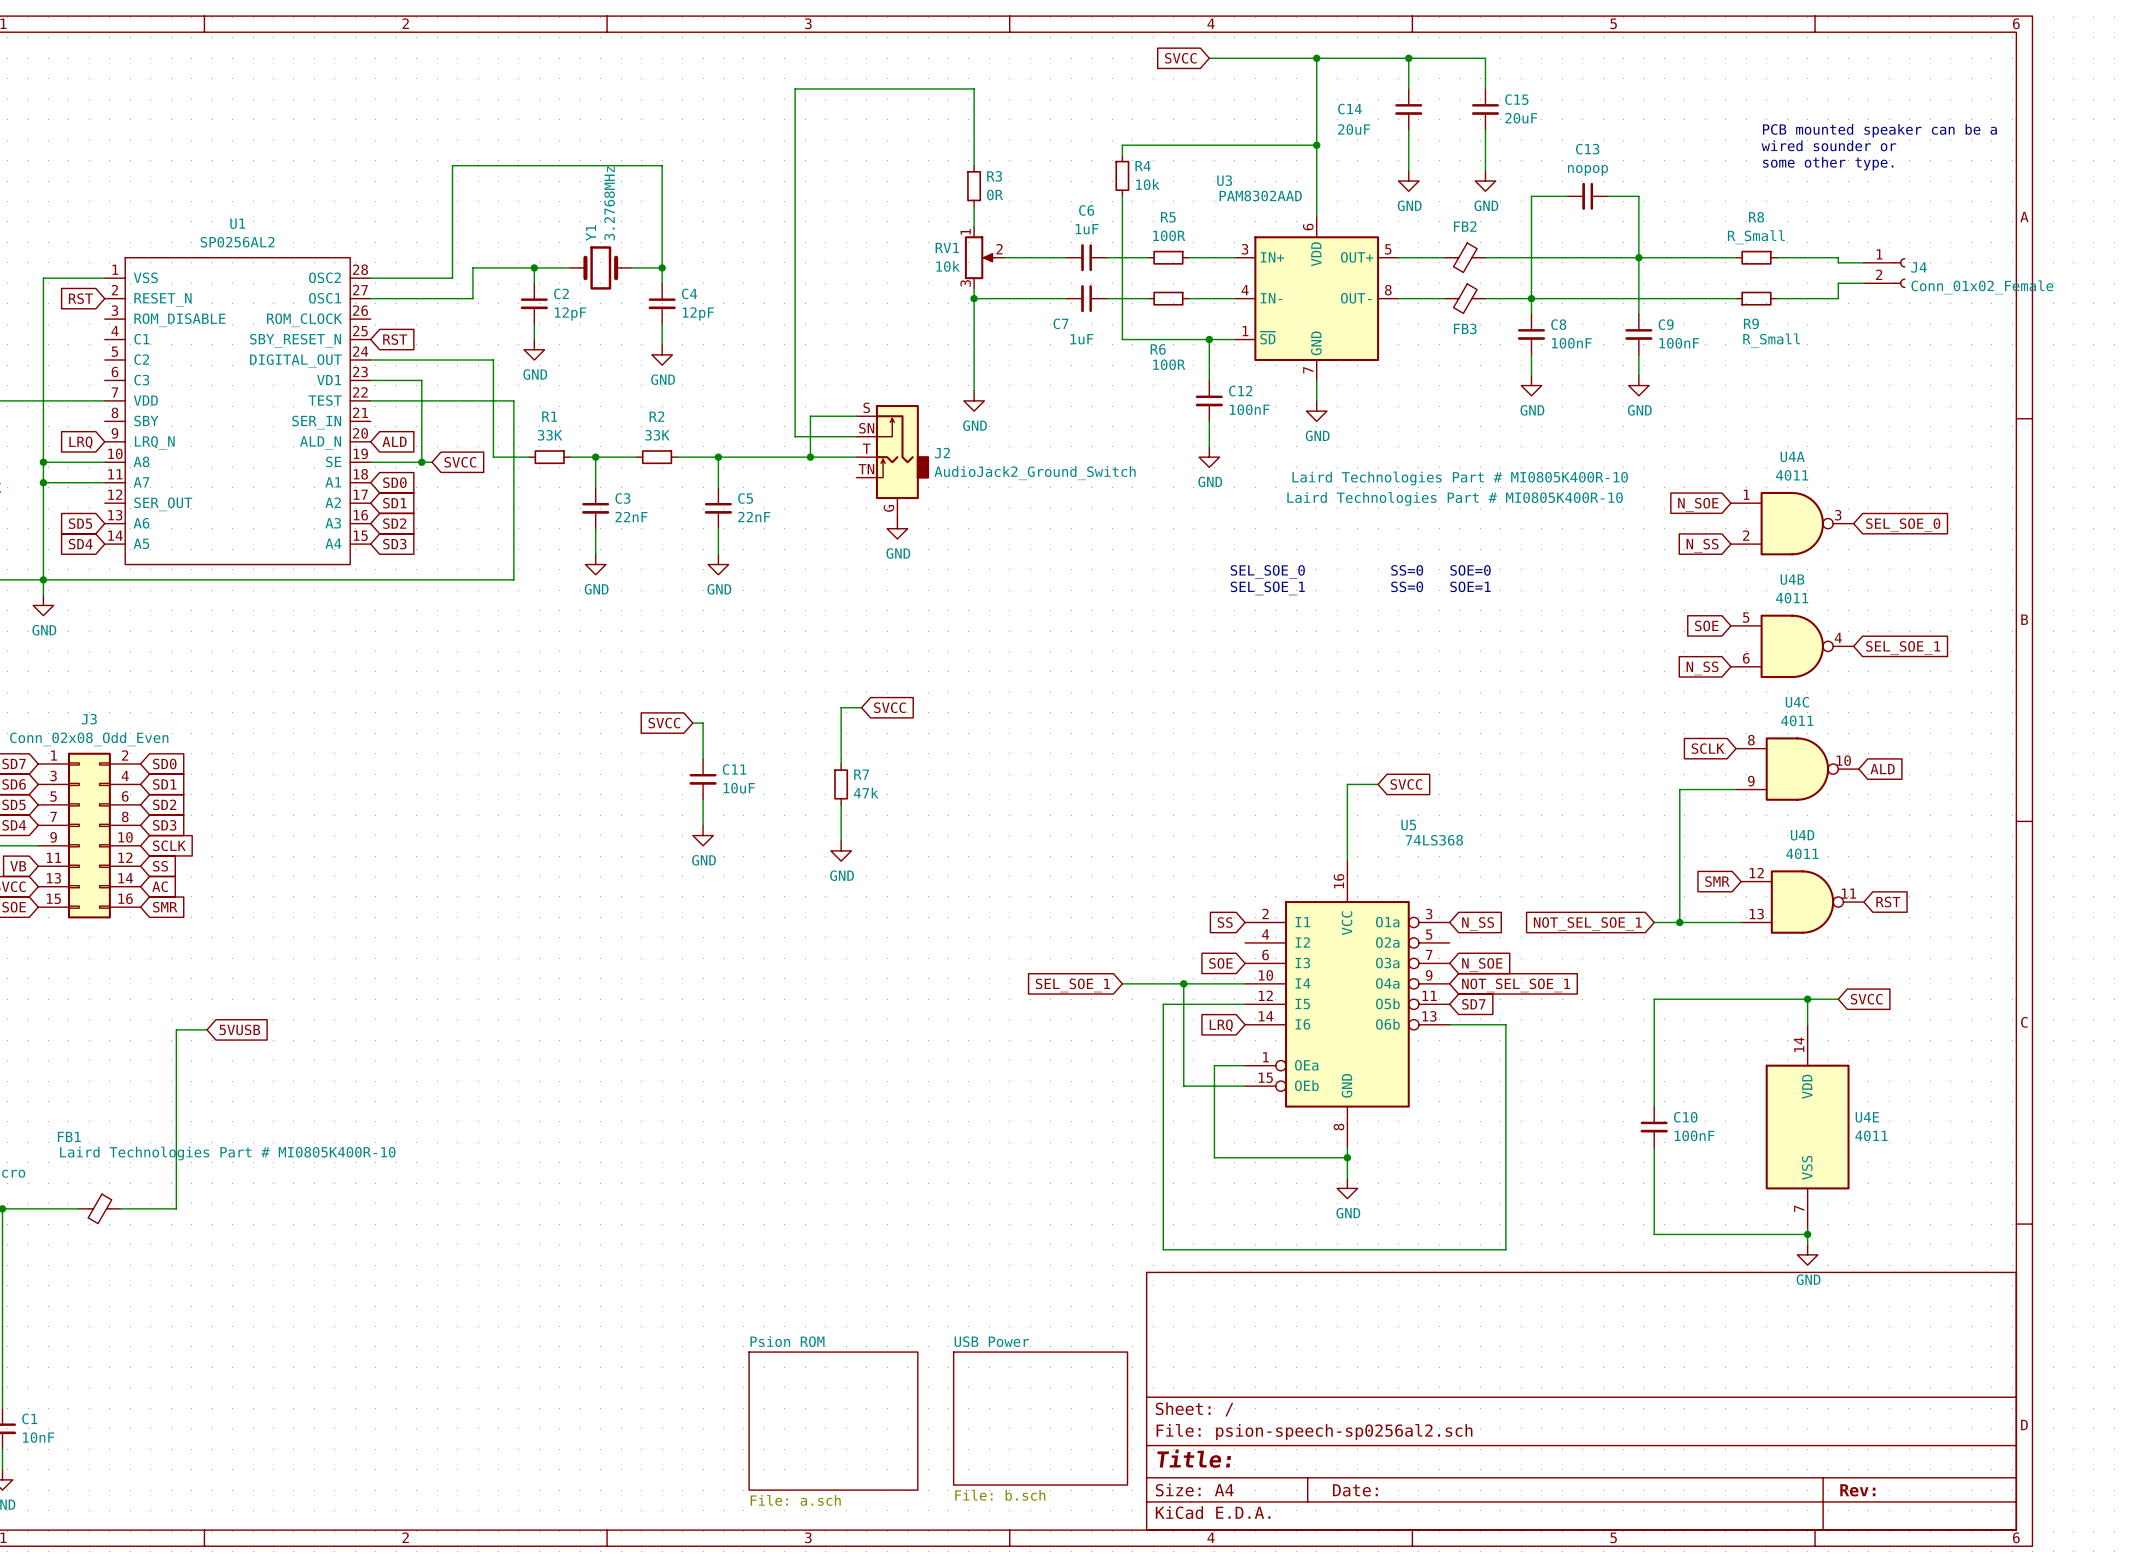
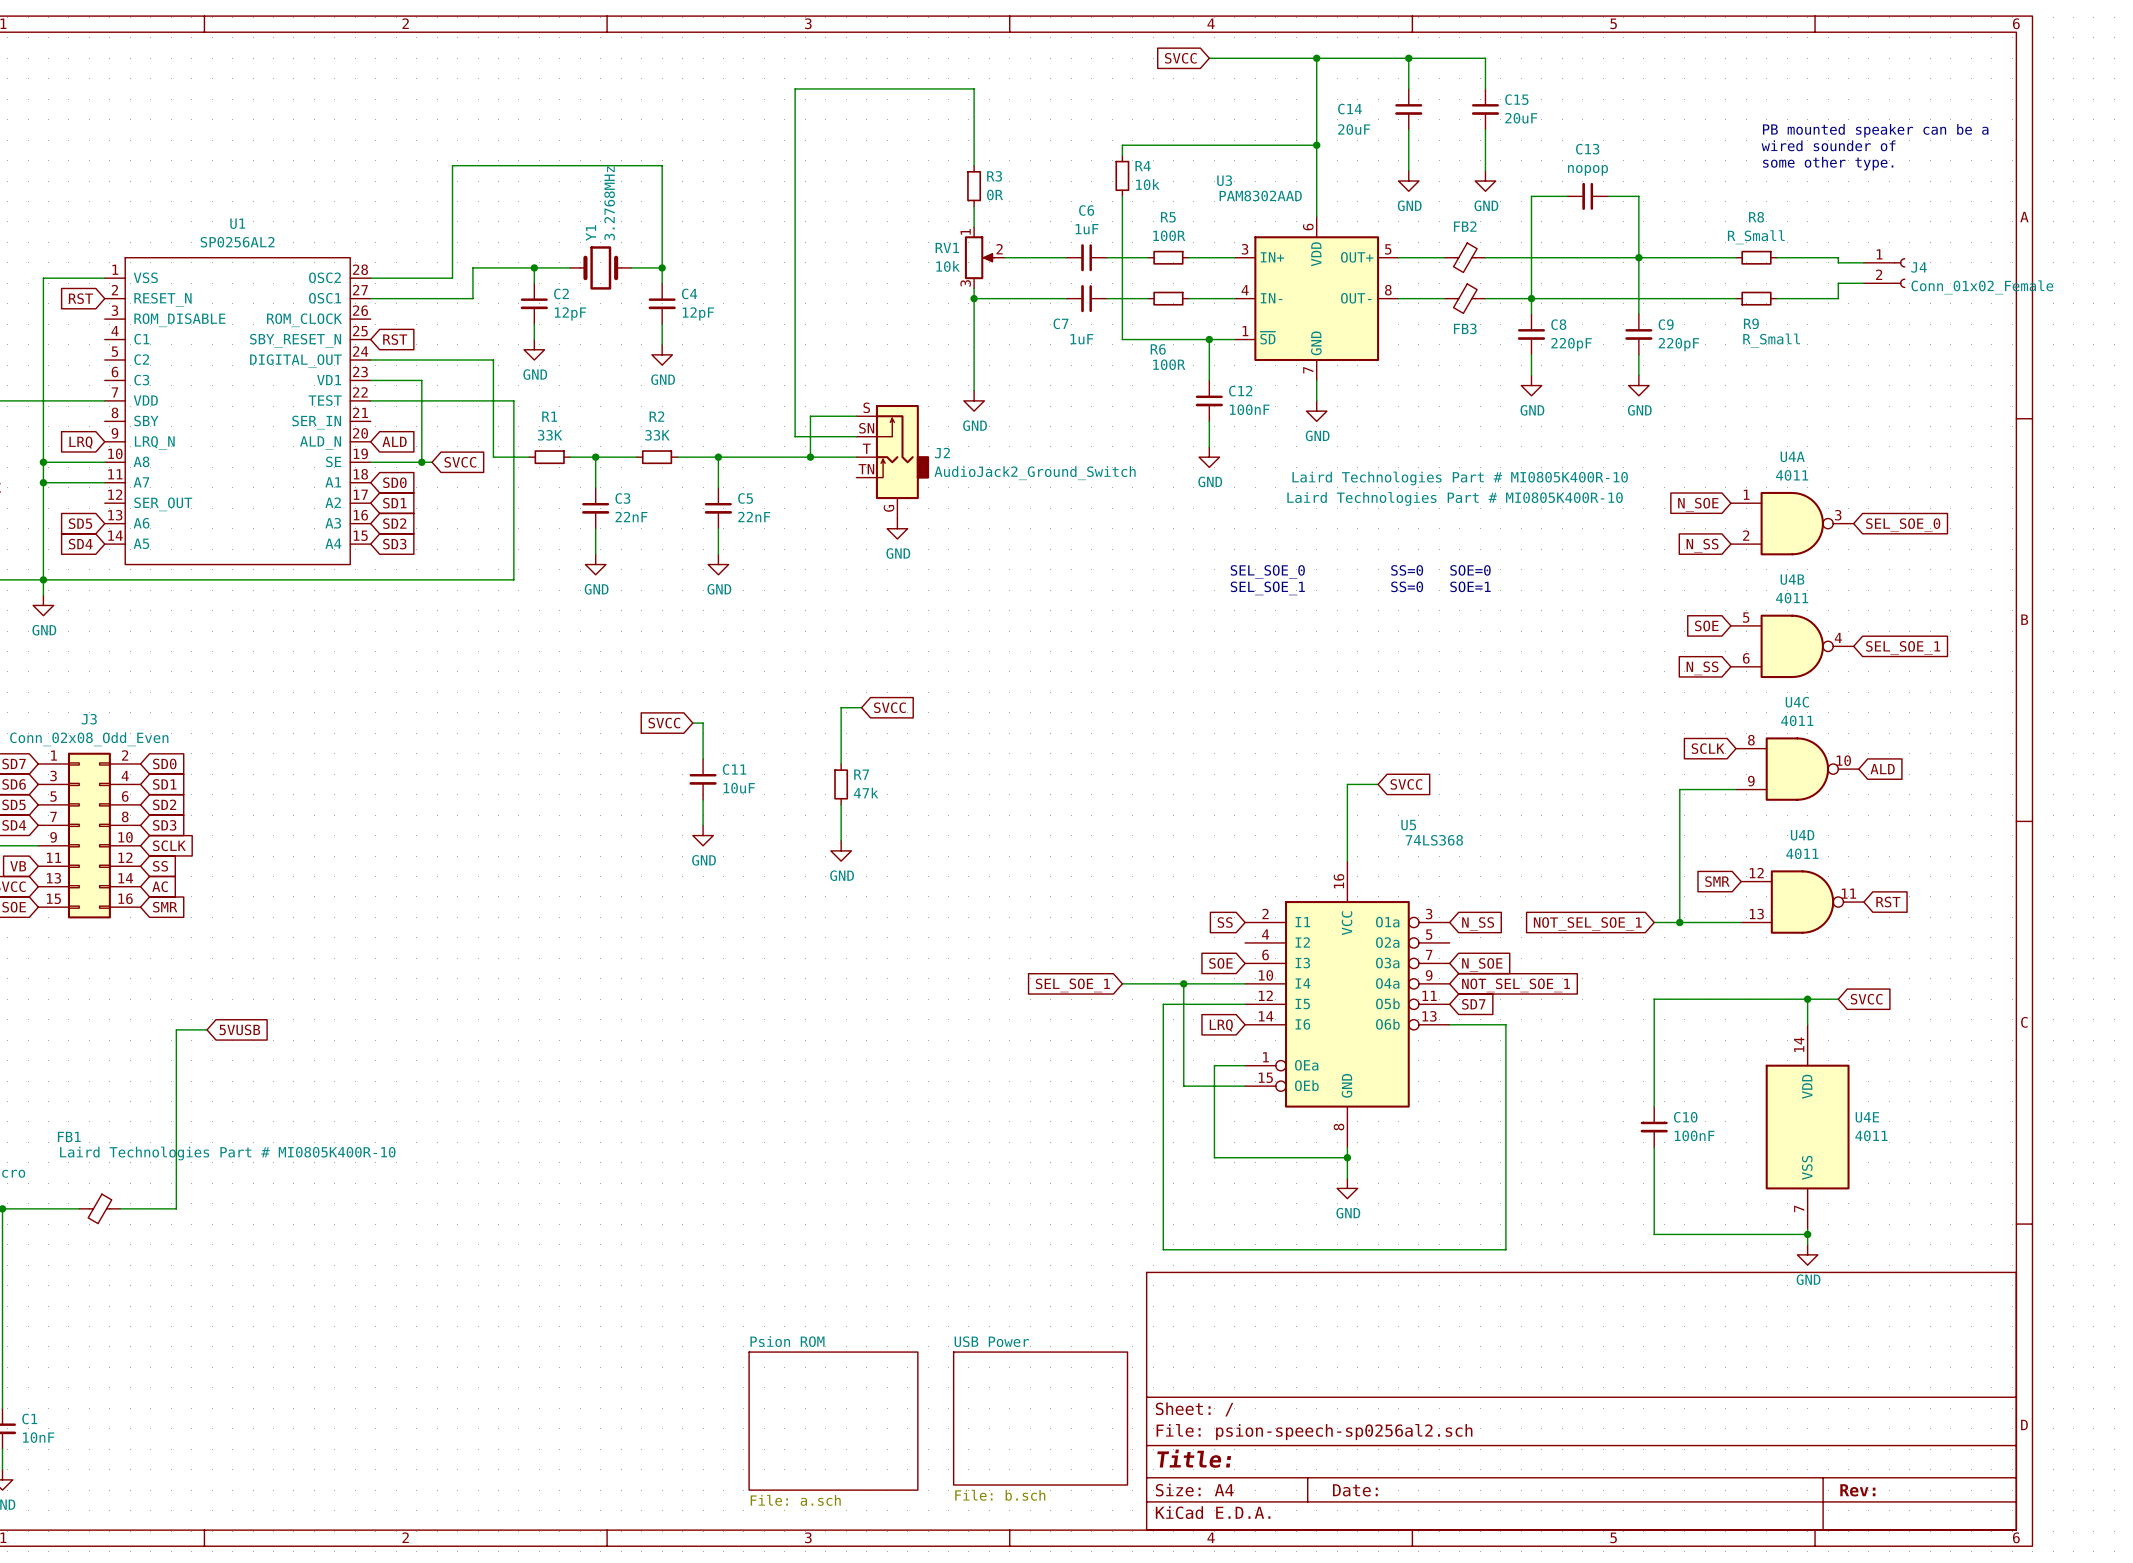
text: PCB mounted speaker can be a (1879, 130) -> PB mounted speaker can be a (1875, 130)
text: wired sounder or (1828, 145) -> wired sounder of (1828, 145)
C8 value: 100nF (1571, 343) -> 220pF (1571, 344)
C9 value: 100nF (1679, 343) -> 220pF (1678, 344)

